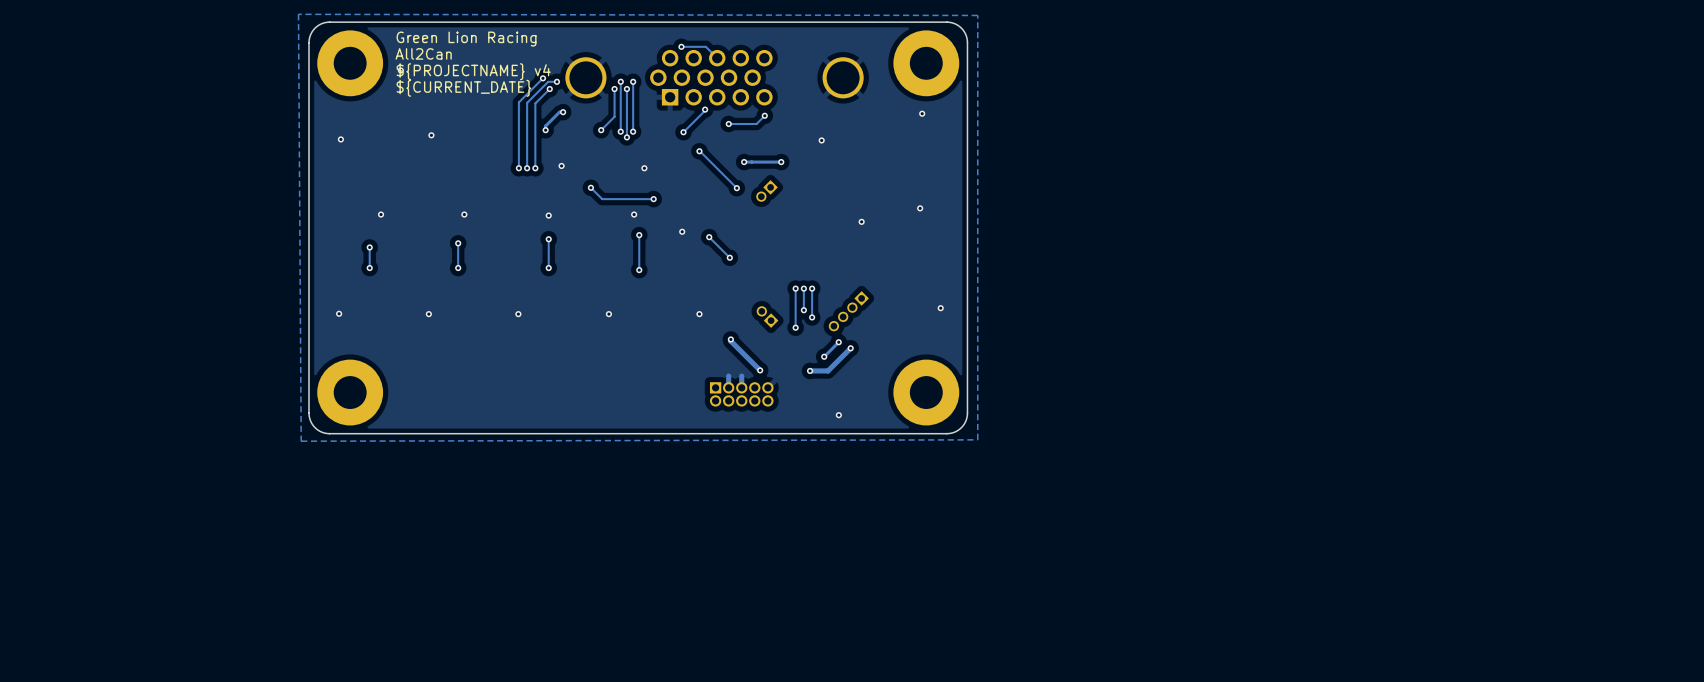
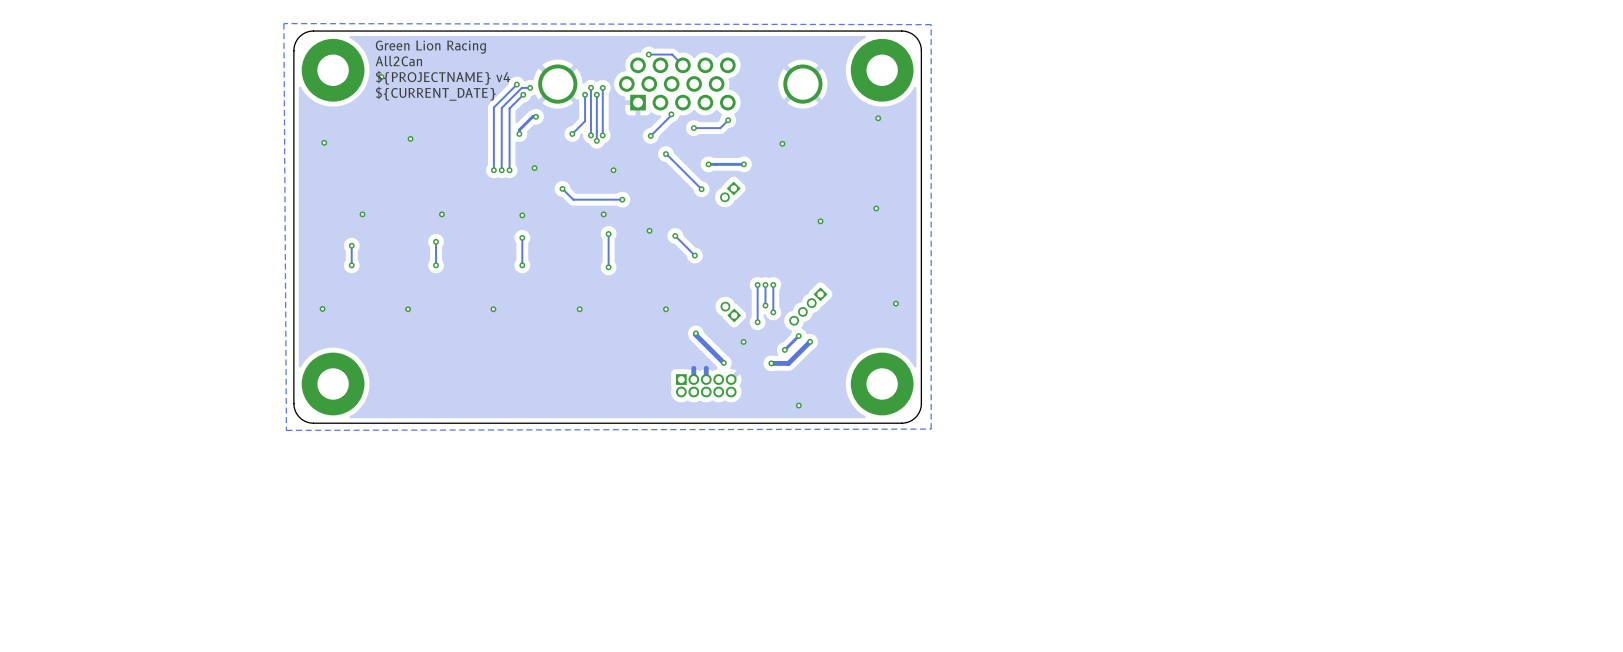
via: none -> (743, 341)

